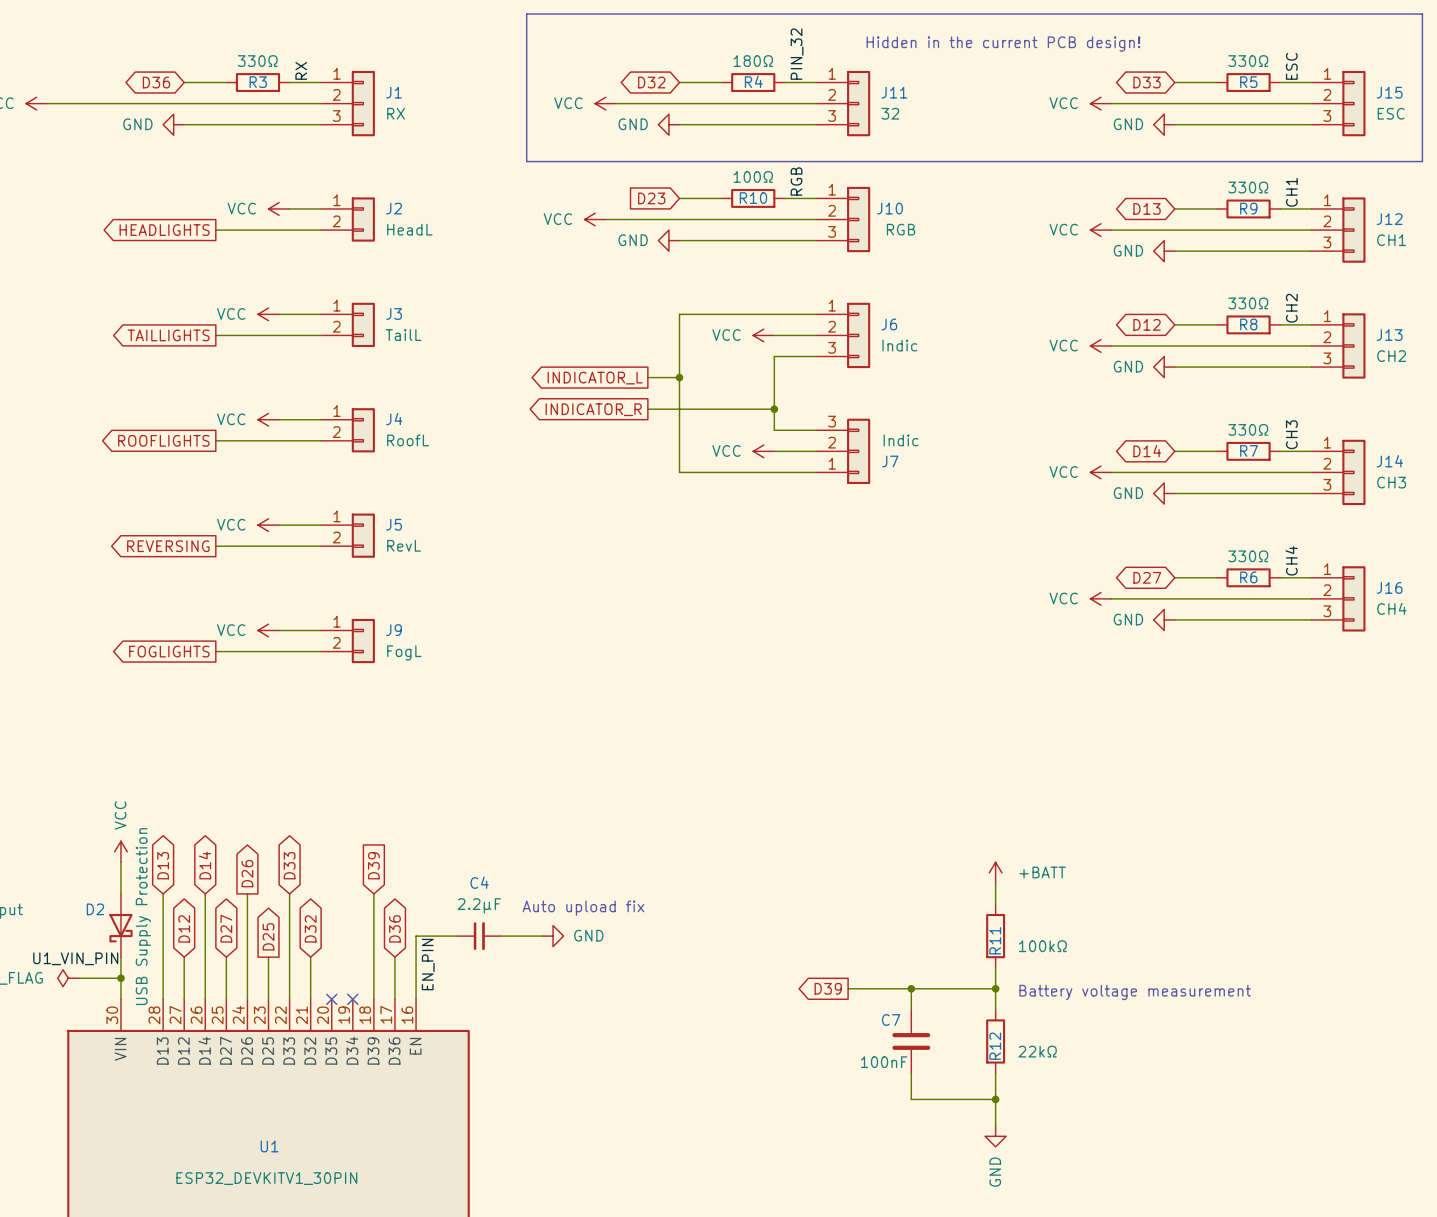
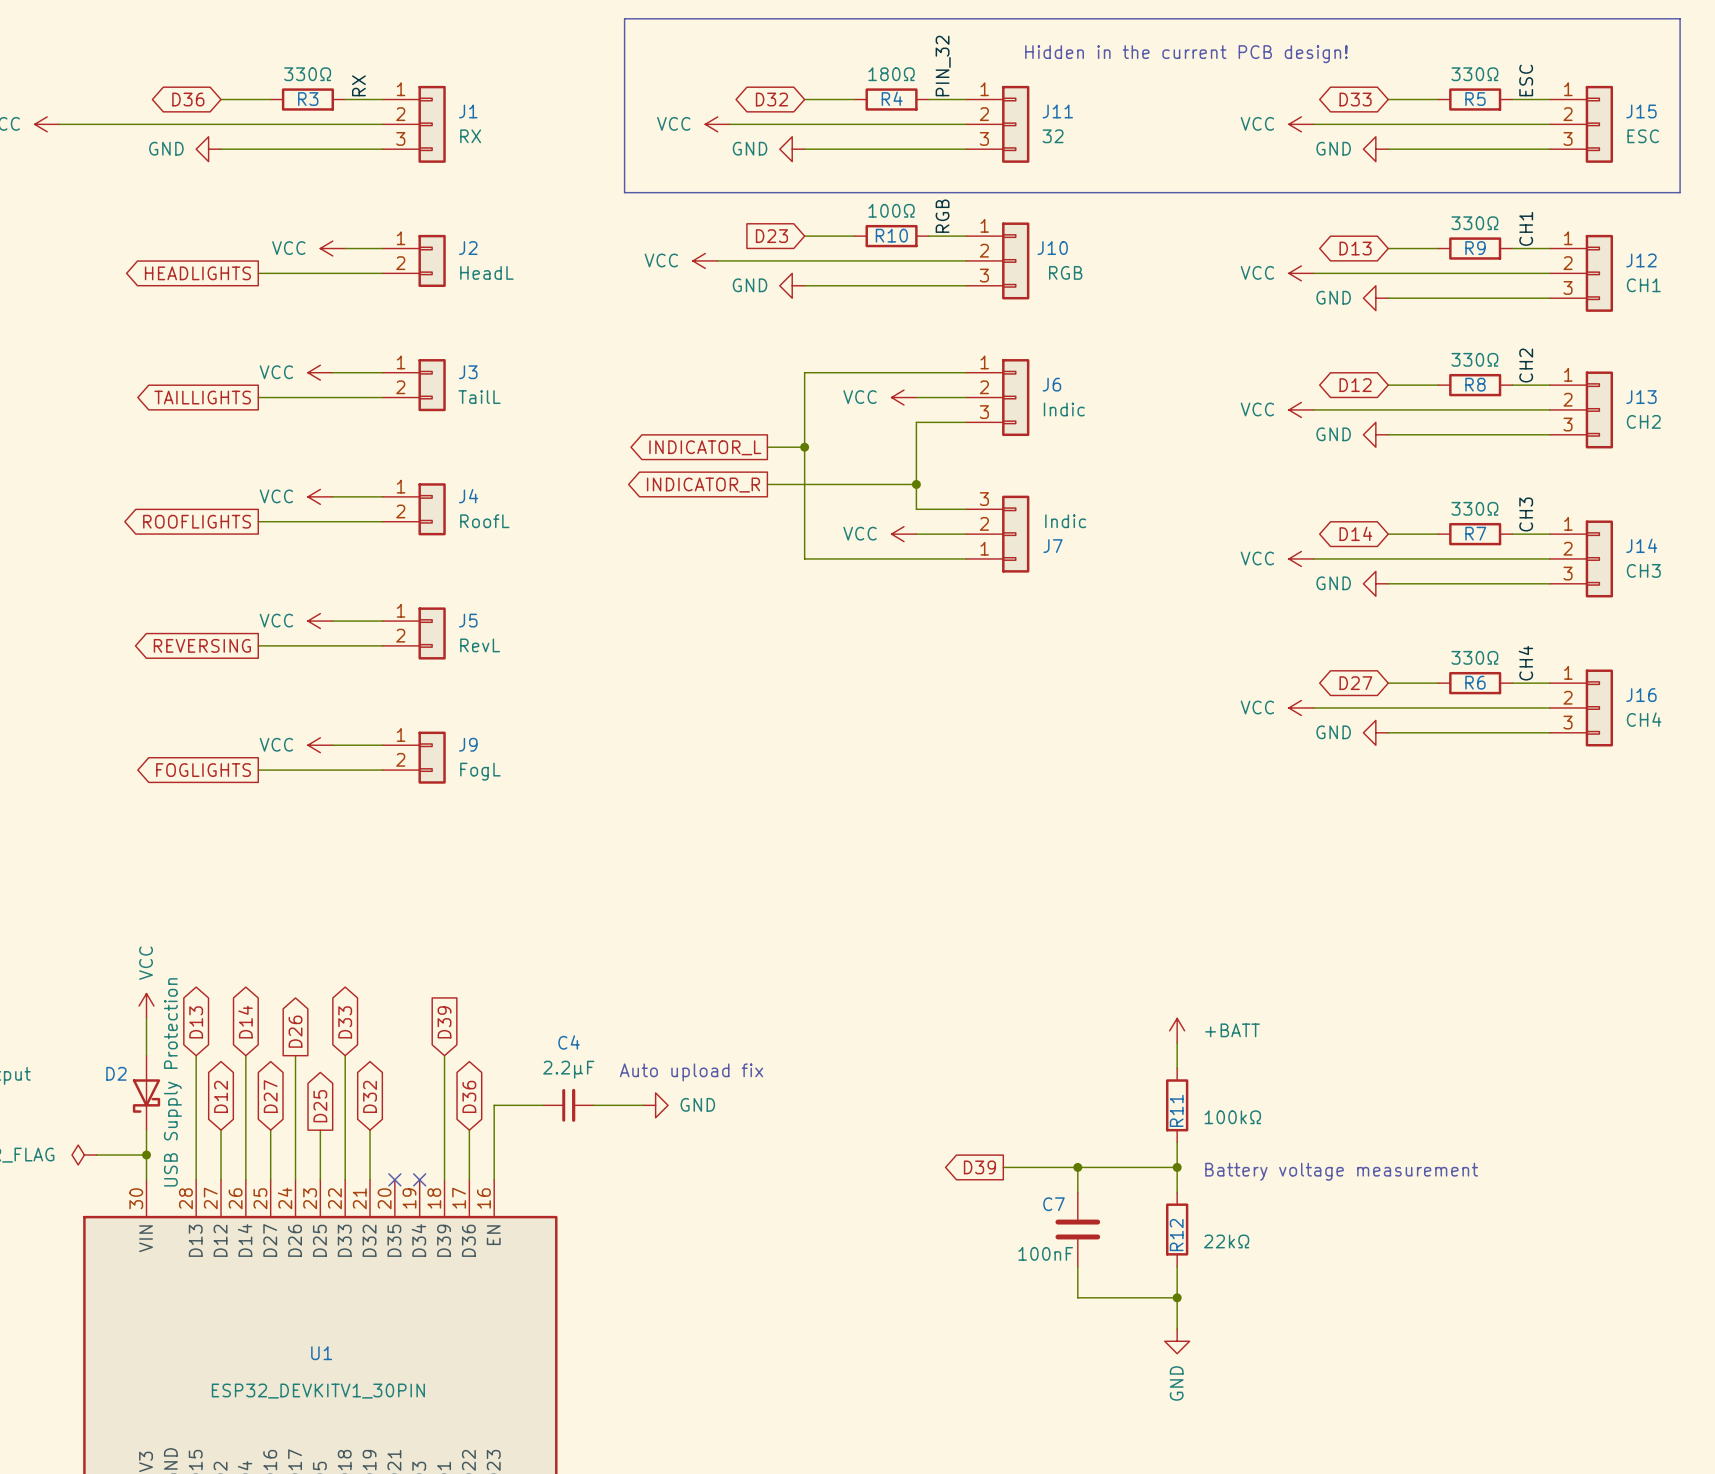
label: U1_VIN_PIN (75, 958) -> none
label: EN_PIN (428, 964) -> none

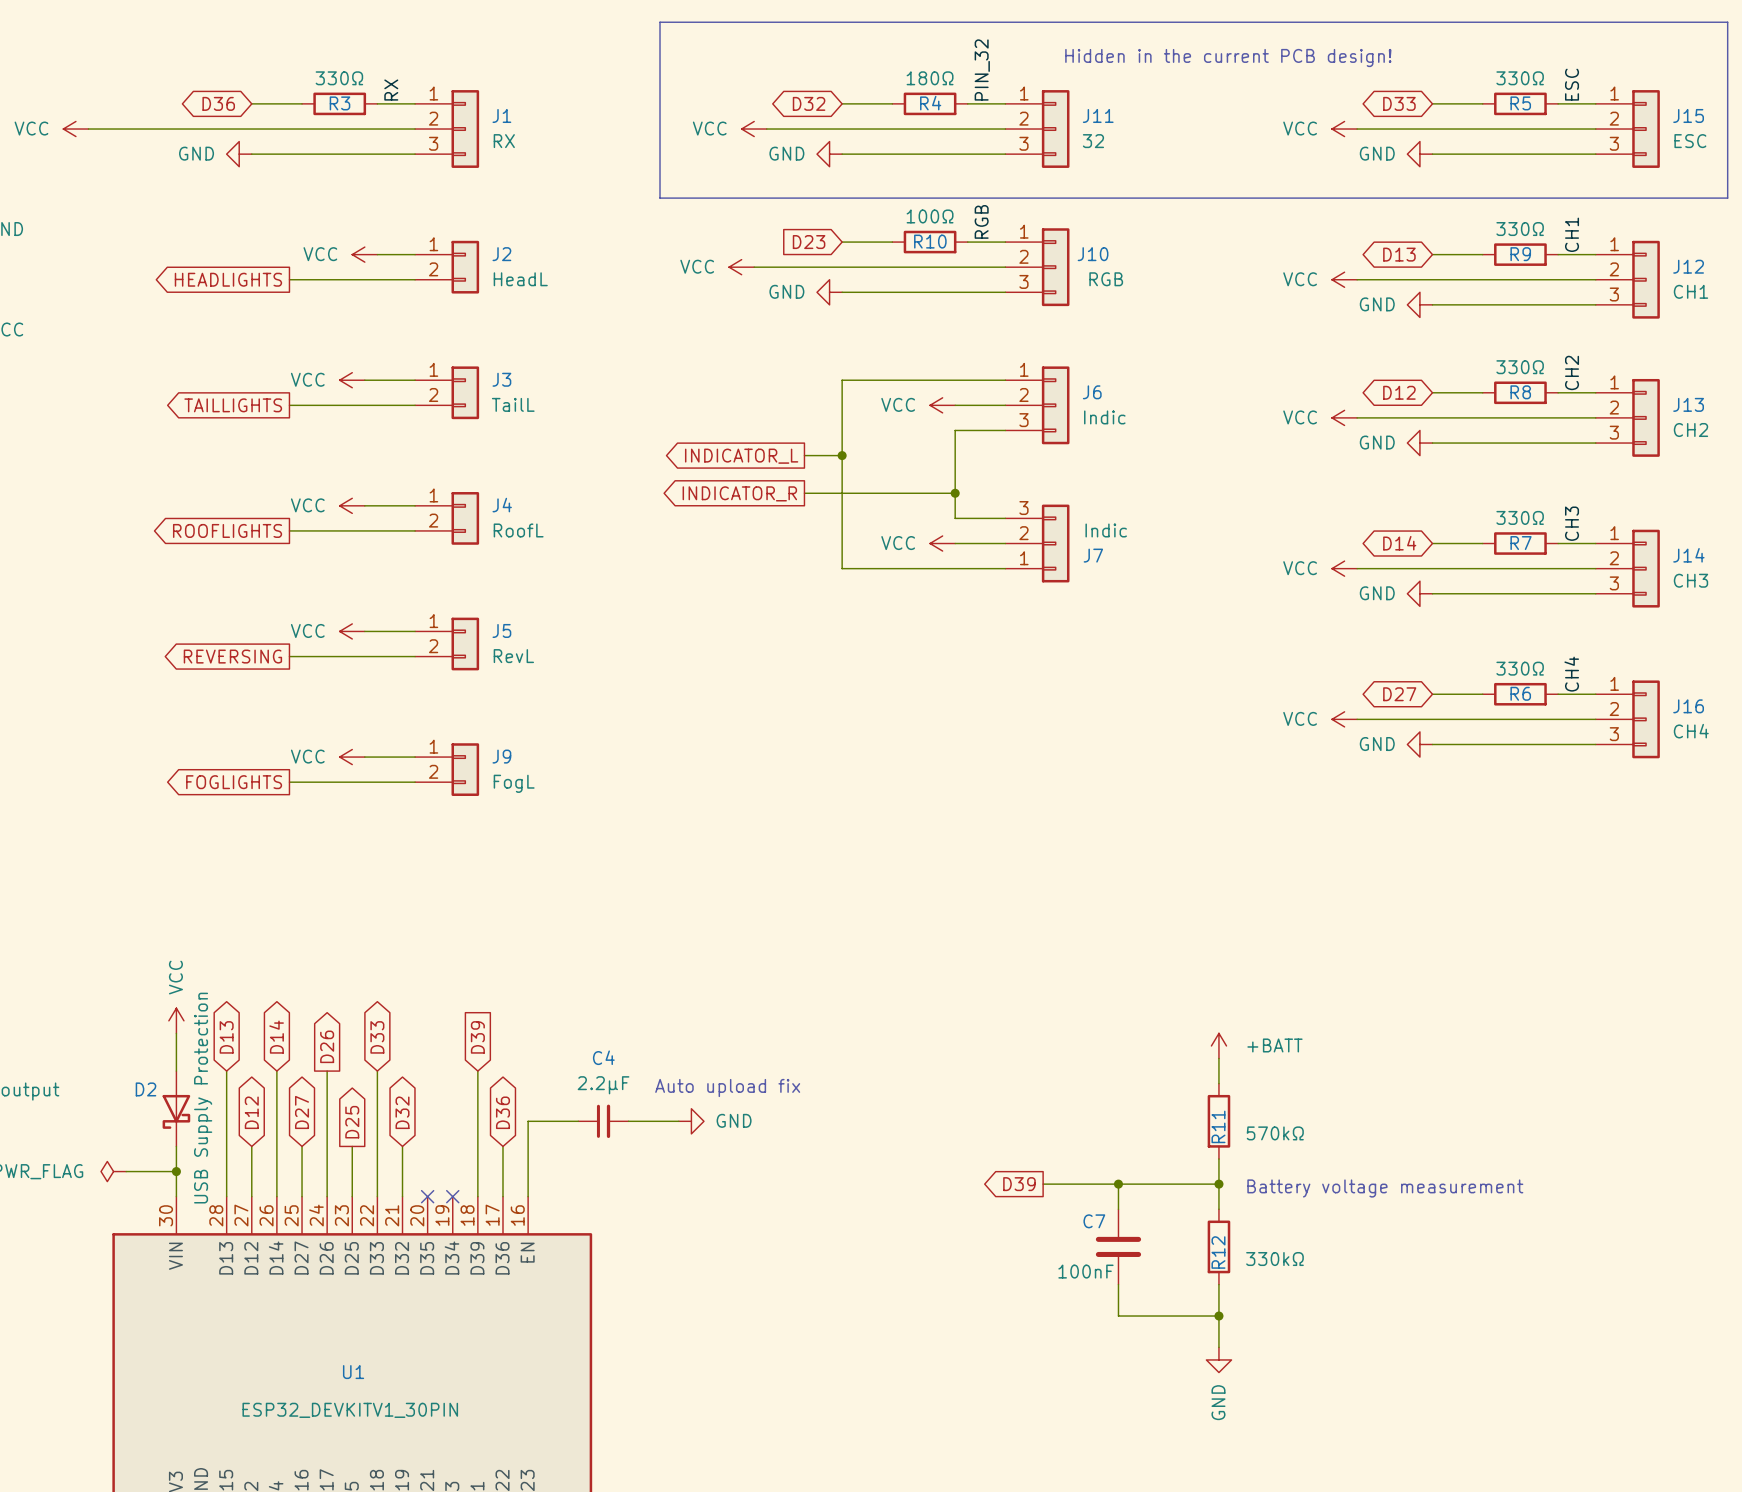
R11 value: 100kΩ (1232, 1117) -> 570kΩ (1275, 1133)
R12 value: 22kΩ (1226, 1241) -> 330kΩ (1274, 1259)

